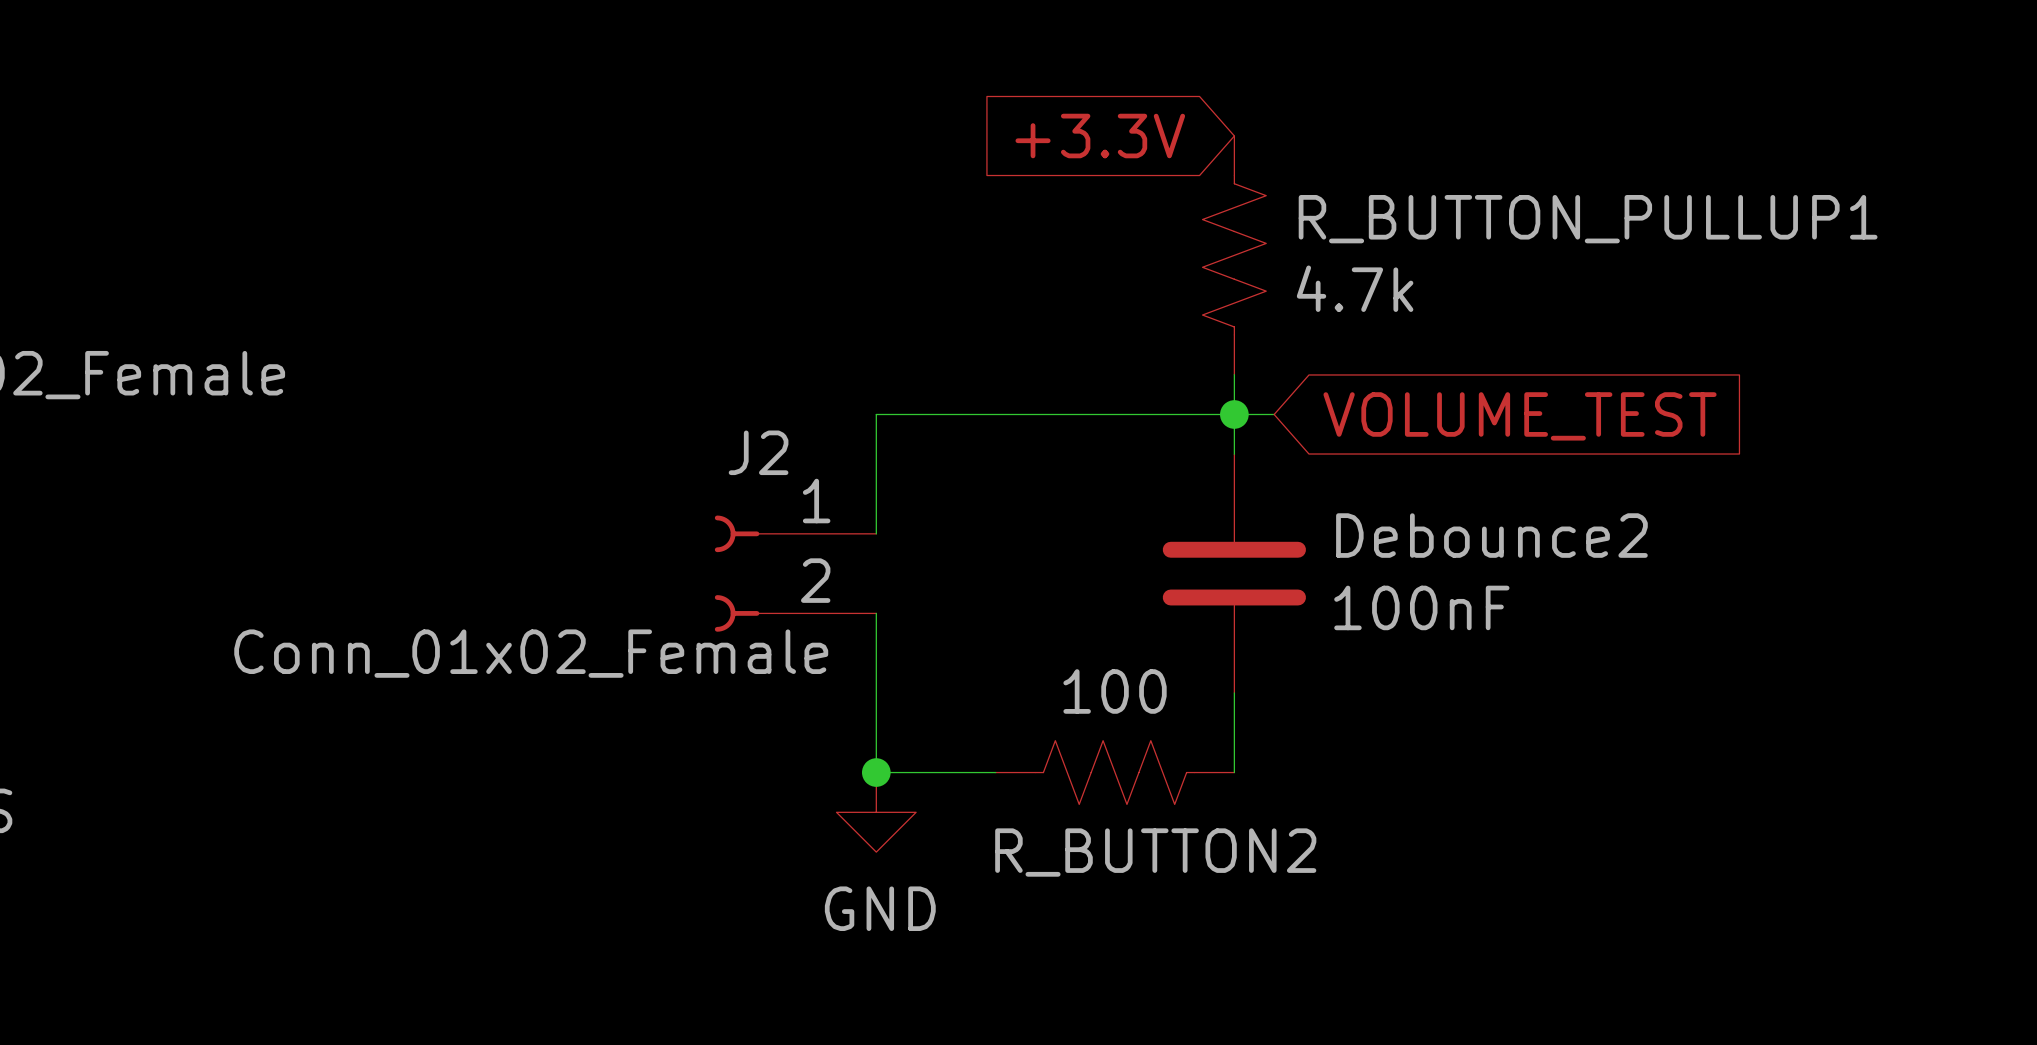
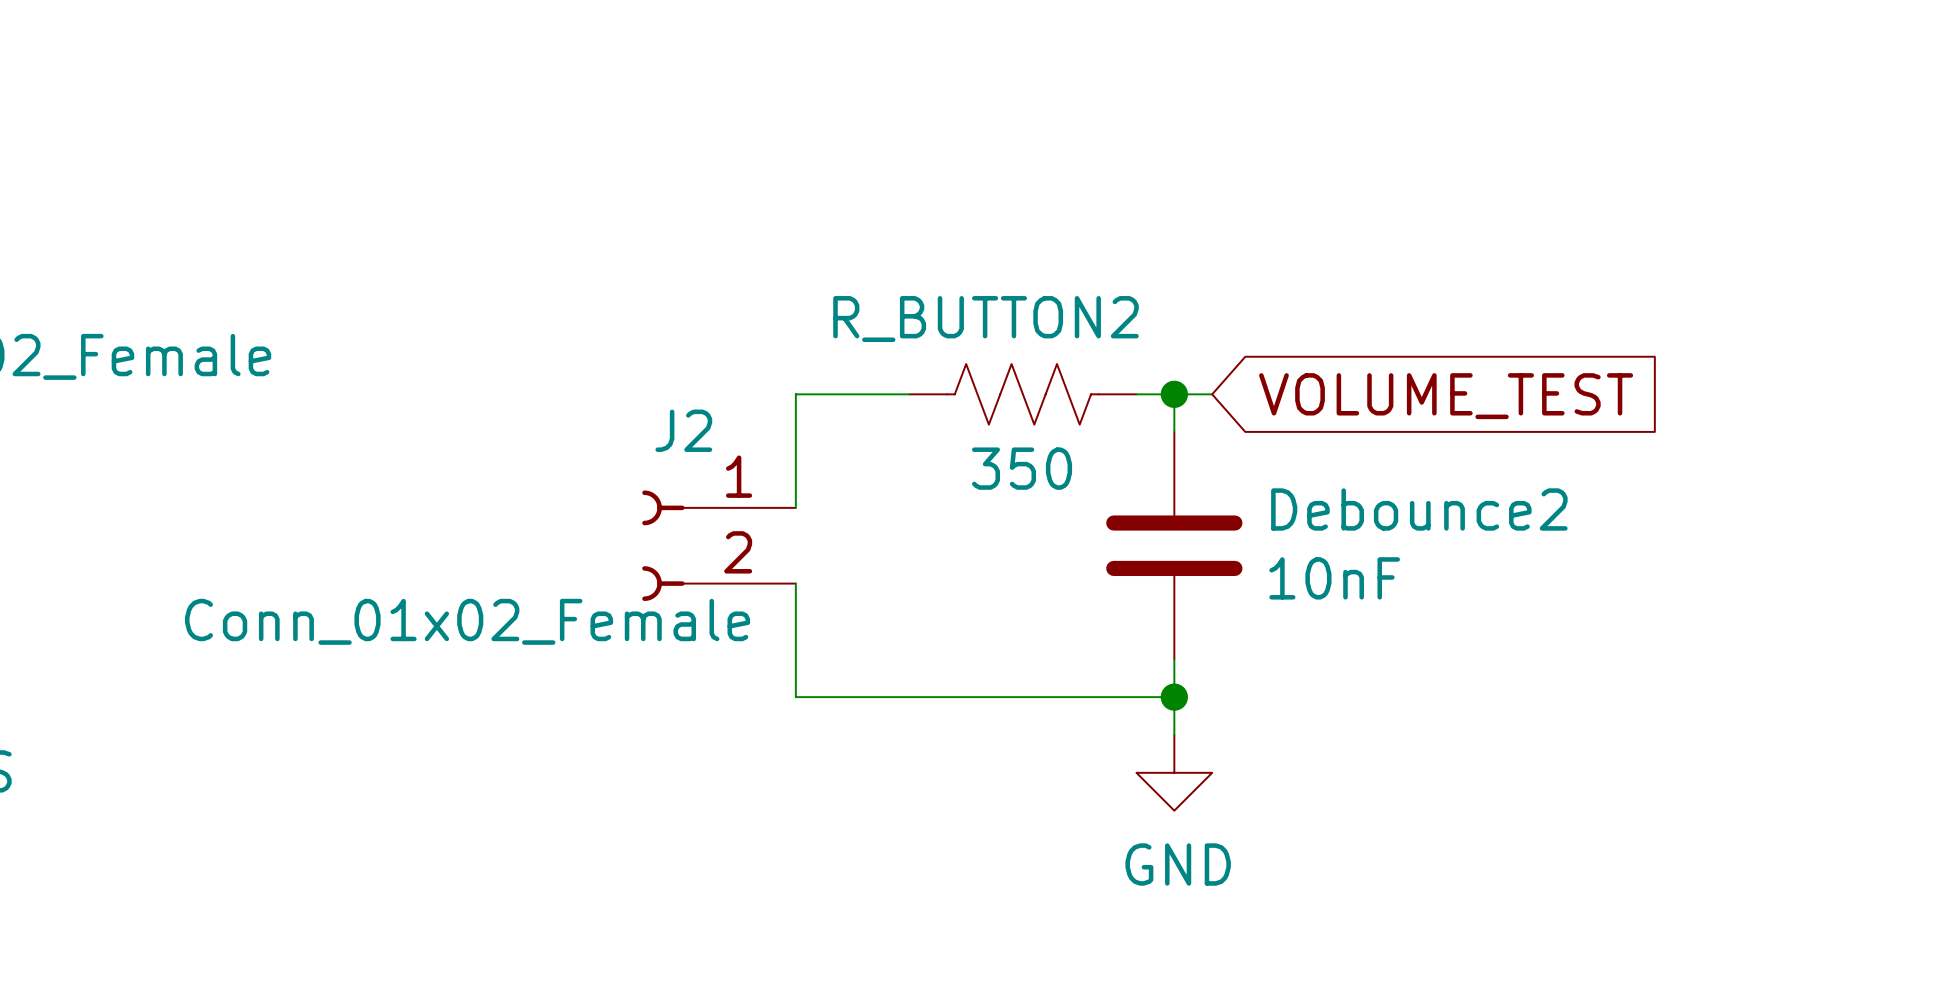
global label: +3.3V (1100, 136) -> none
R_BUTTON_PULLUP1: 4.7k (1234, 255) -> none
wire: (1234, 374) (1234, 414) -> none
wire: (876, 414) (876, 533) -> (833, 394) (795, 394) (795, 507)
wire: (955, 414) (1194, 414) -> none
J2 position: (795, 573) -> (719, 545)
Debounce2 value: 100nF (1421, 607) -> 10nF (1334, 578)
wire: none -> (795, 583) (795, 697) (1174, 697)
wire: (876, 613) (876, 772) (995, 772) -> none
R_BUTTON2 value: 100 (1115, 691) -> 350 (1022, 468)
junction: none -> (1174, 697)
junction: (876, 772) -> none
R_BUTTON2 position: (1115, 772) -> (1022, 394)
power symbol position: GND (876, 812) -> GND (1174, 772)
R_BUTTON2 name position: R_BUTTON2 (1155, 852) -> R_BUTTON2 (986, 319)

